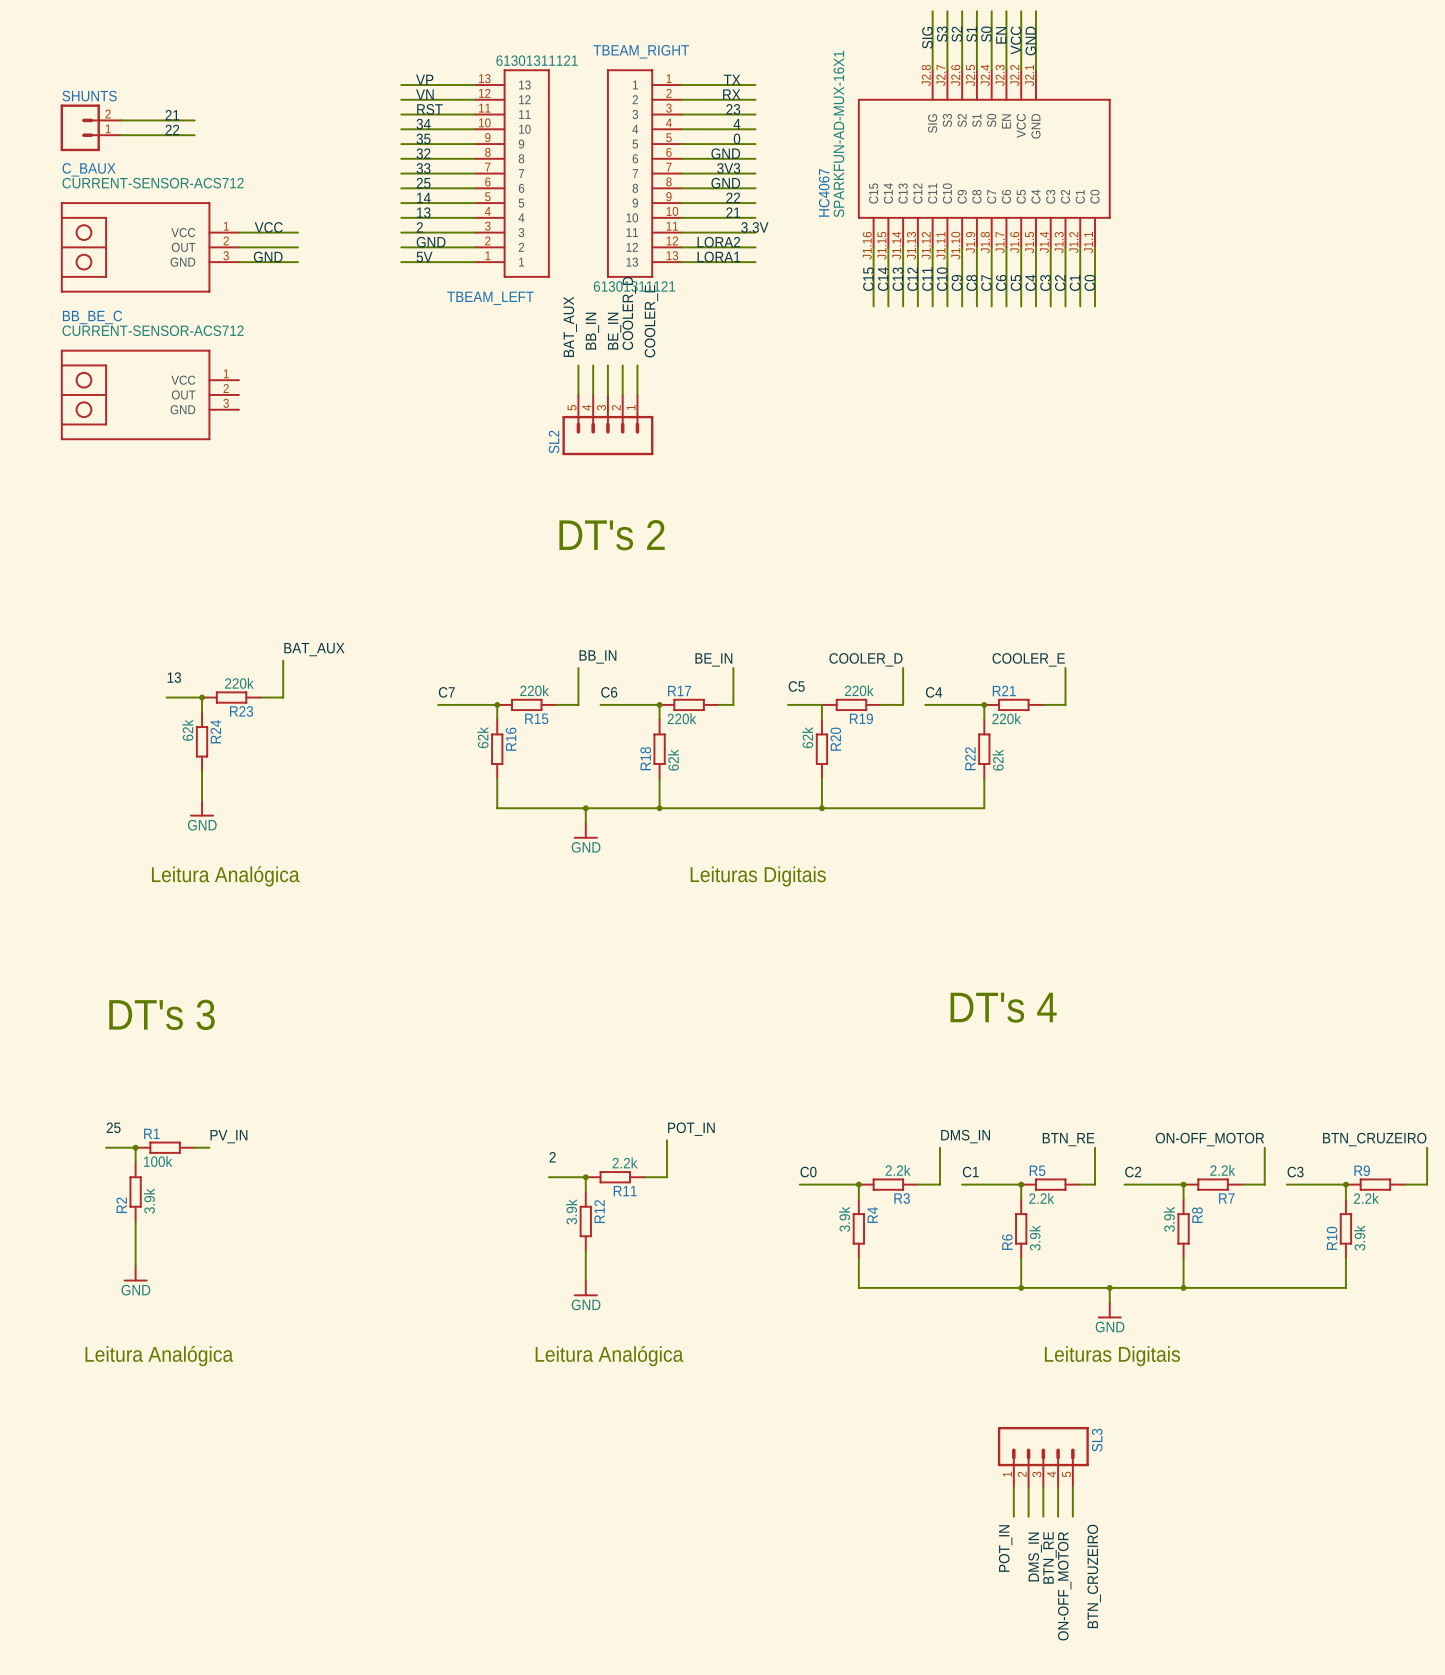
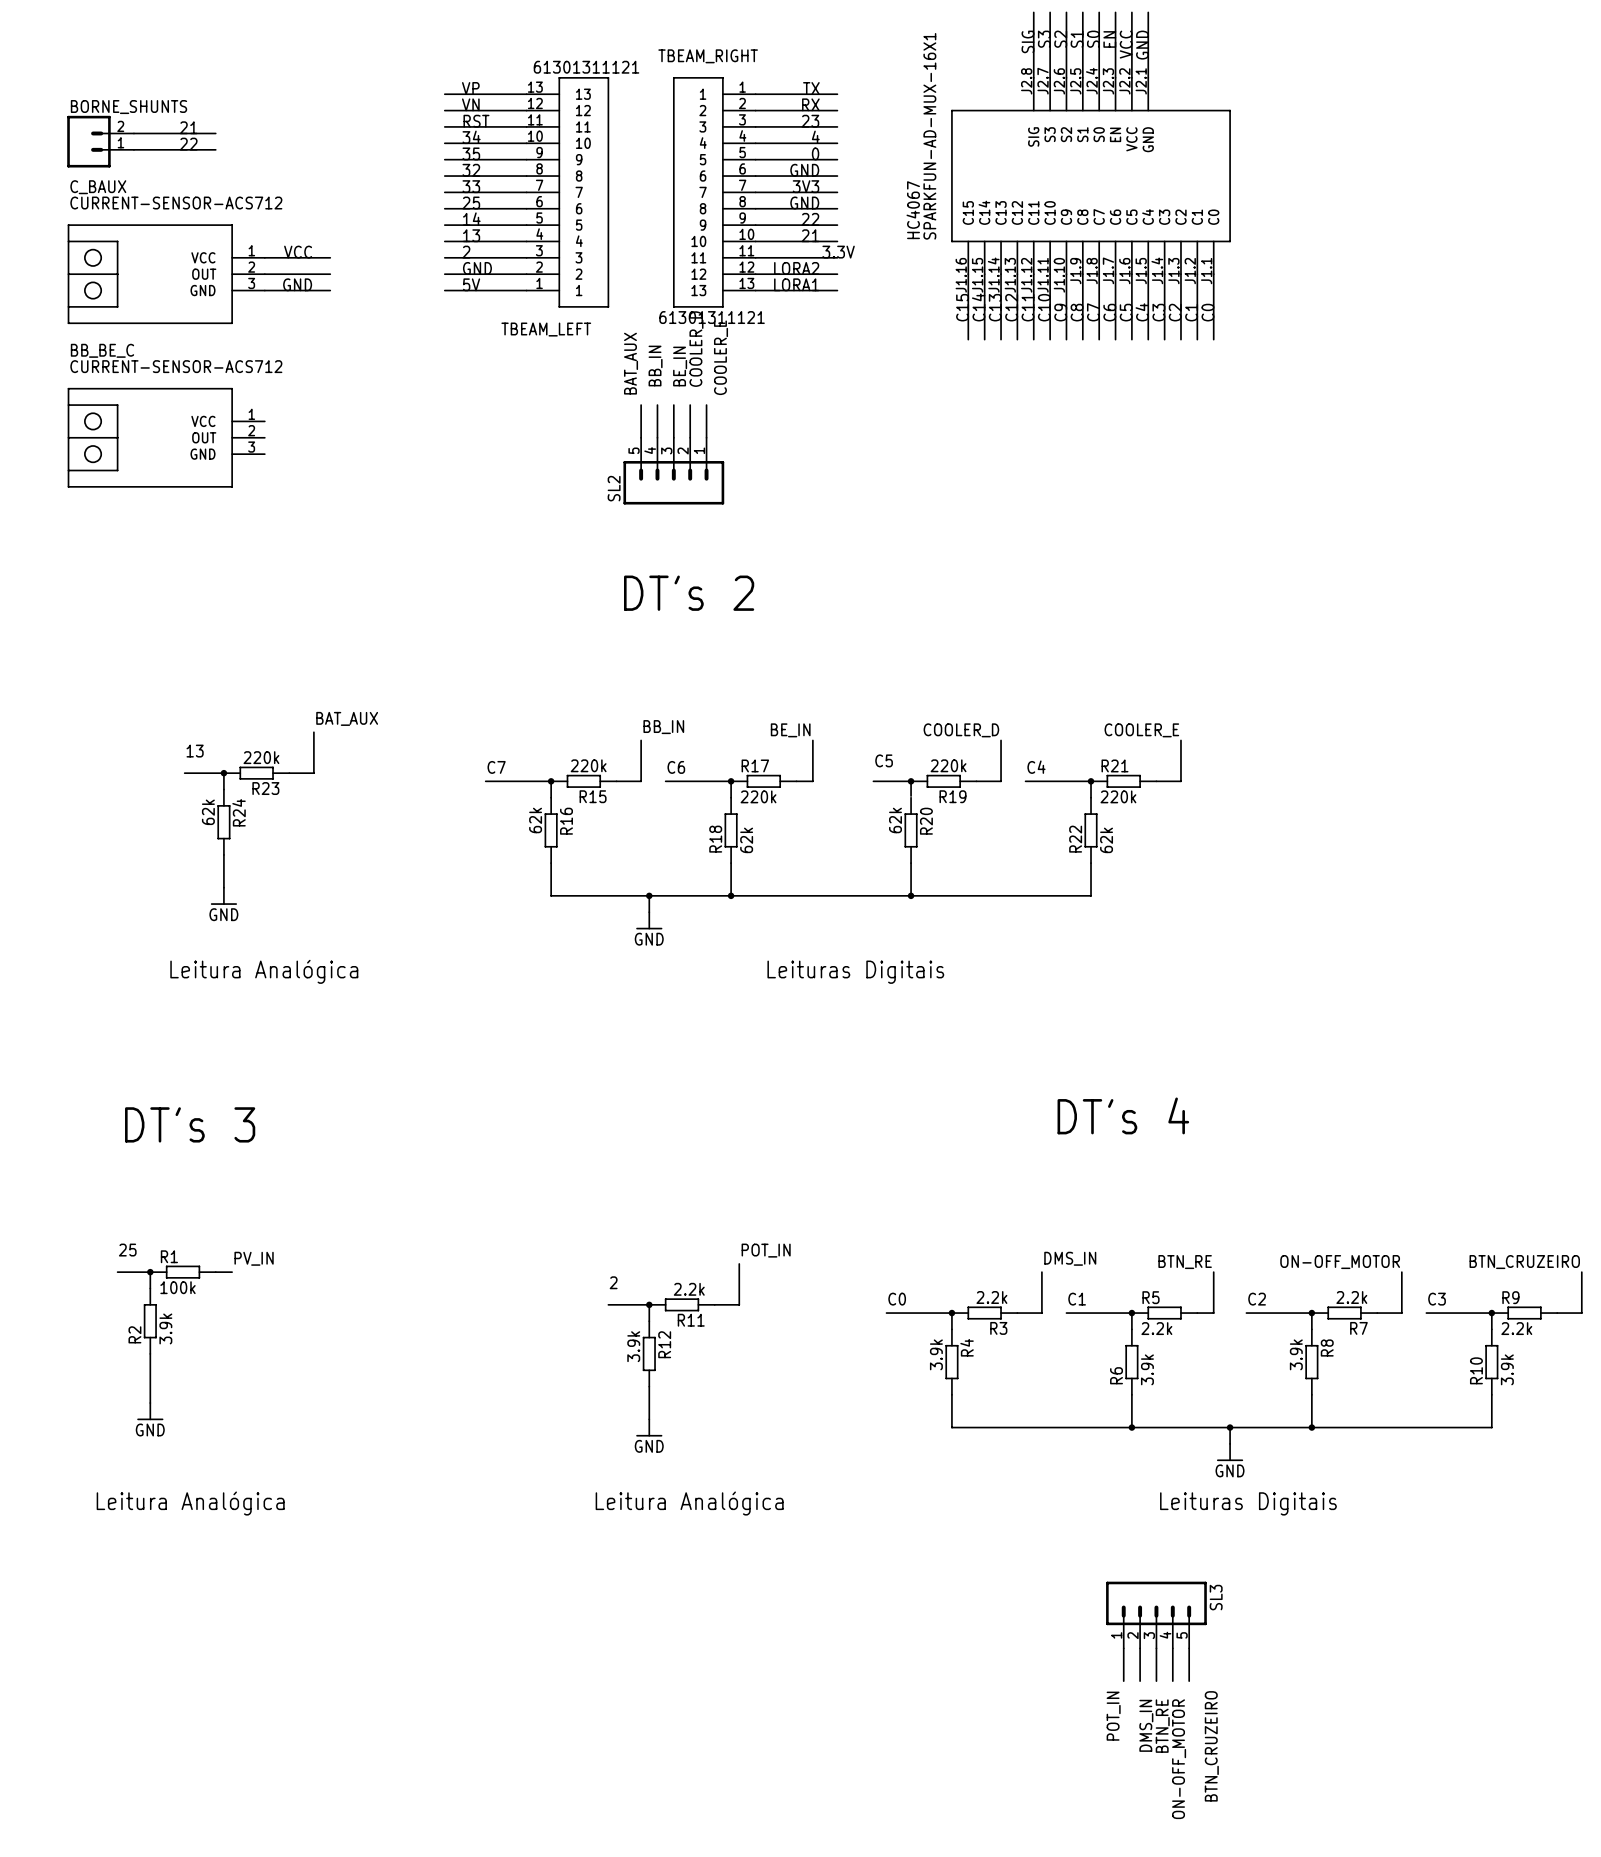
SHUNTS name: SHUNTS (89, 96) -> BORNE_SHUNTS (128, 107)
junction: none -> (911, 781)

